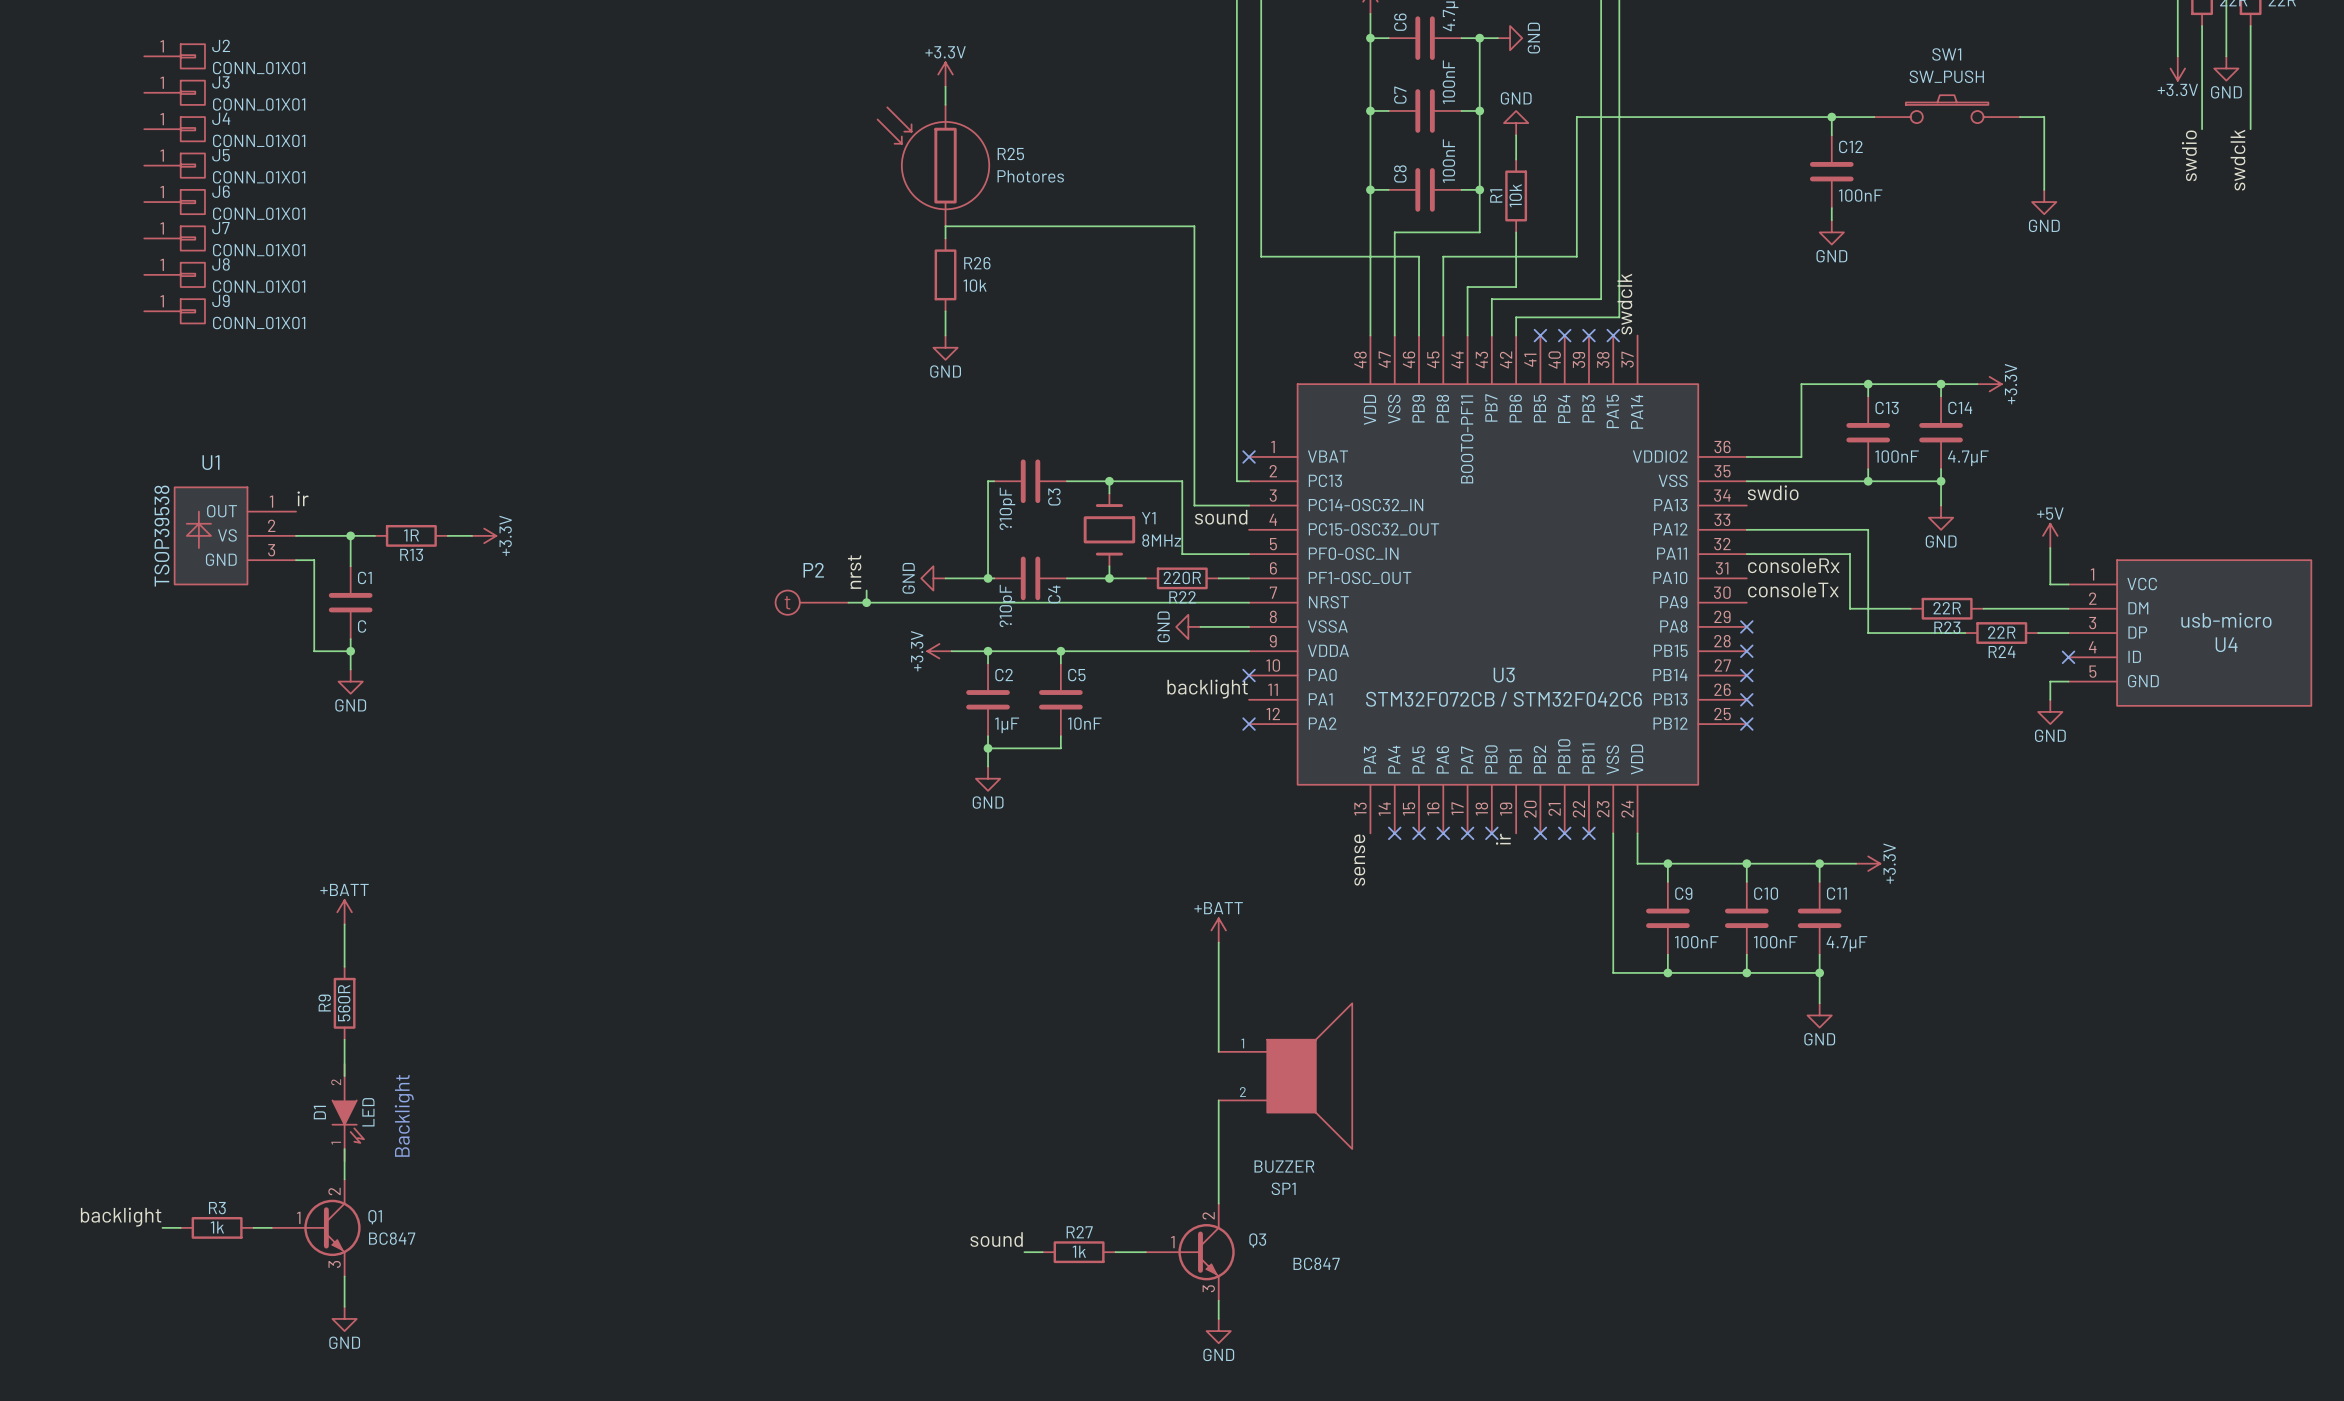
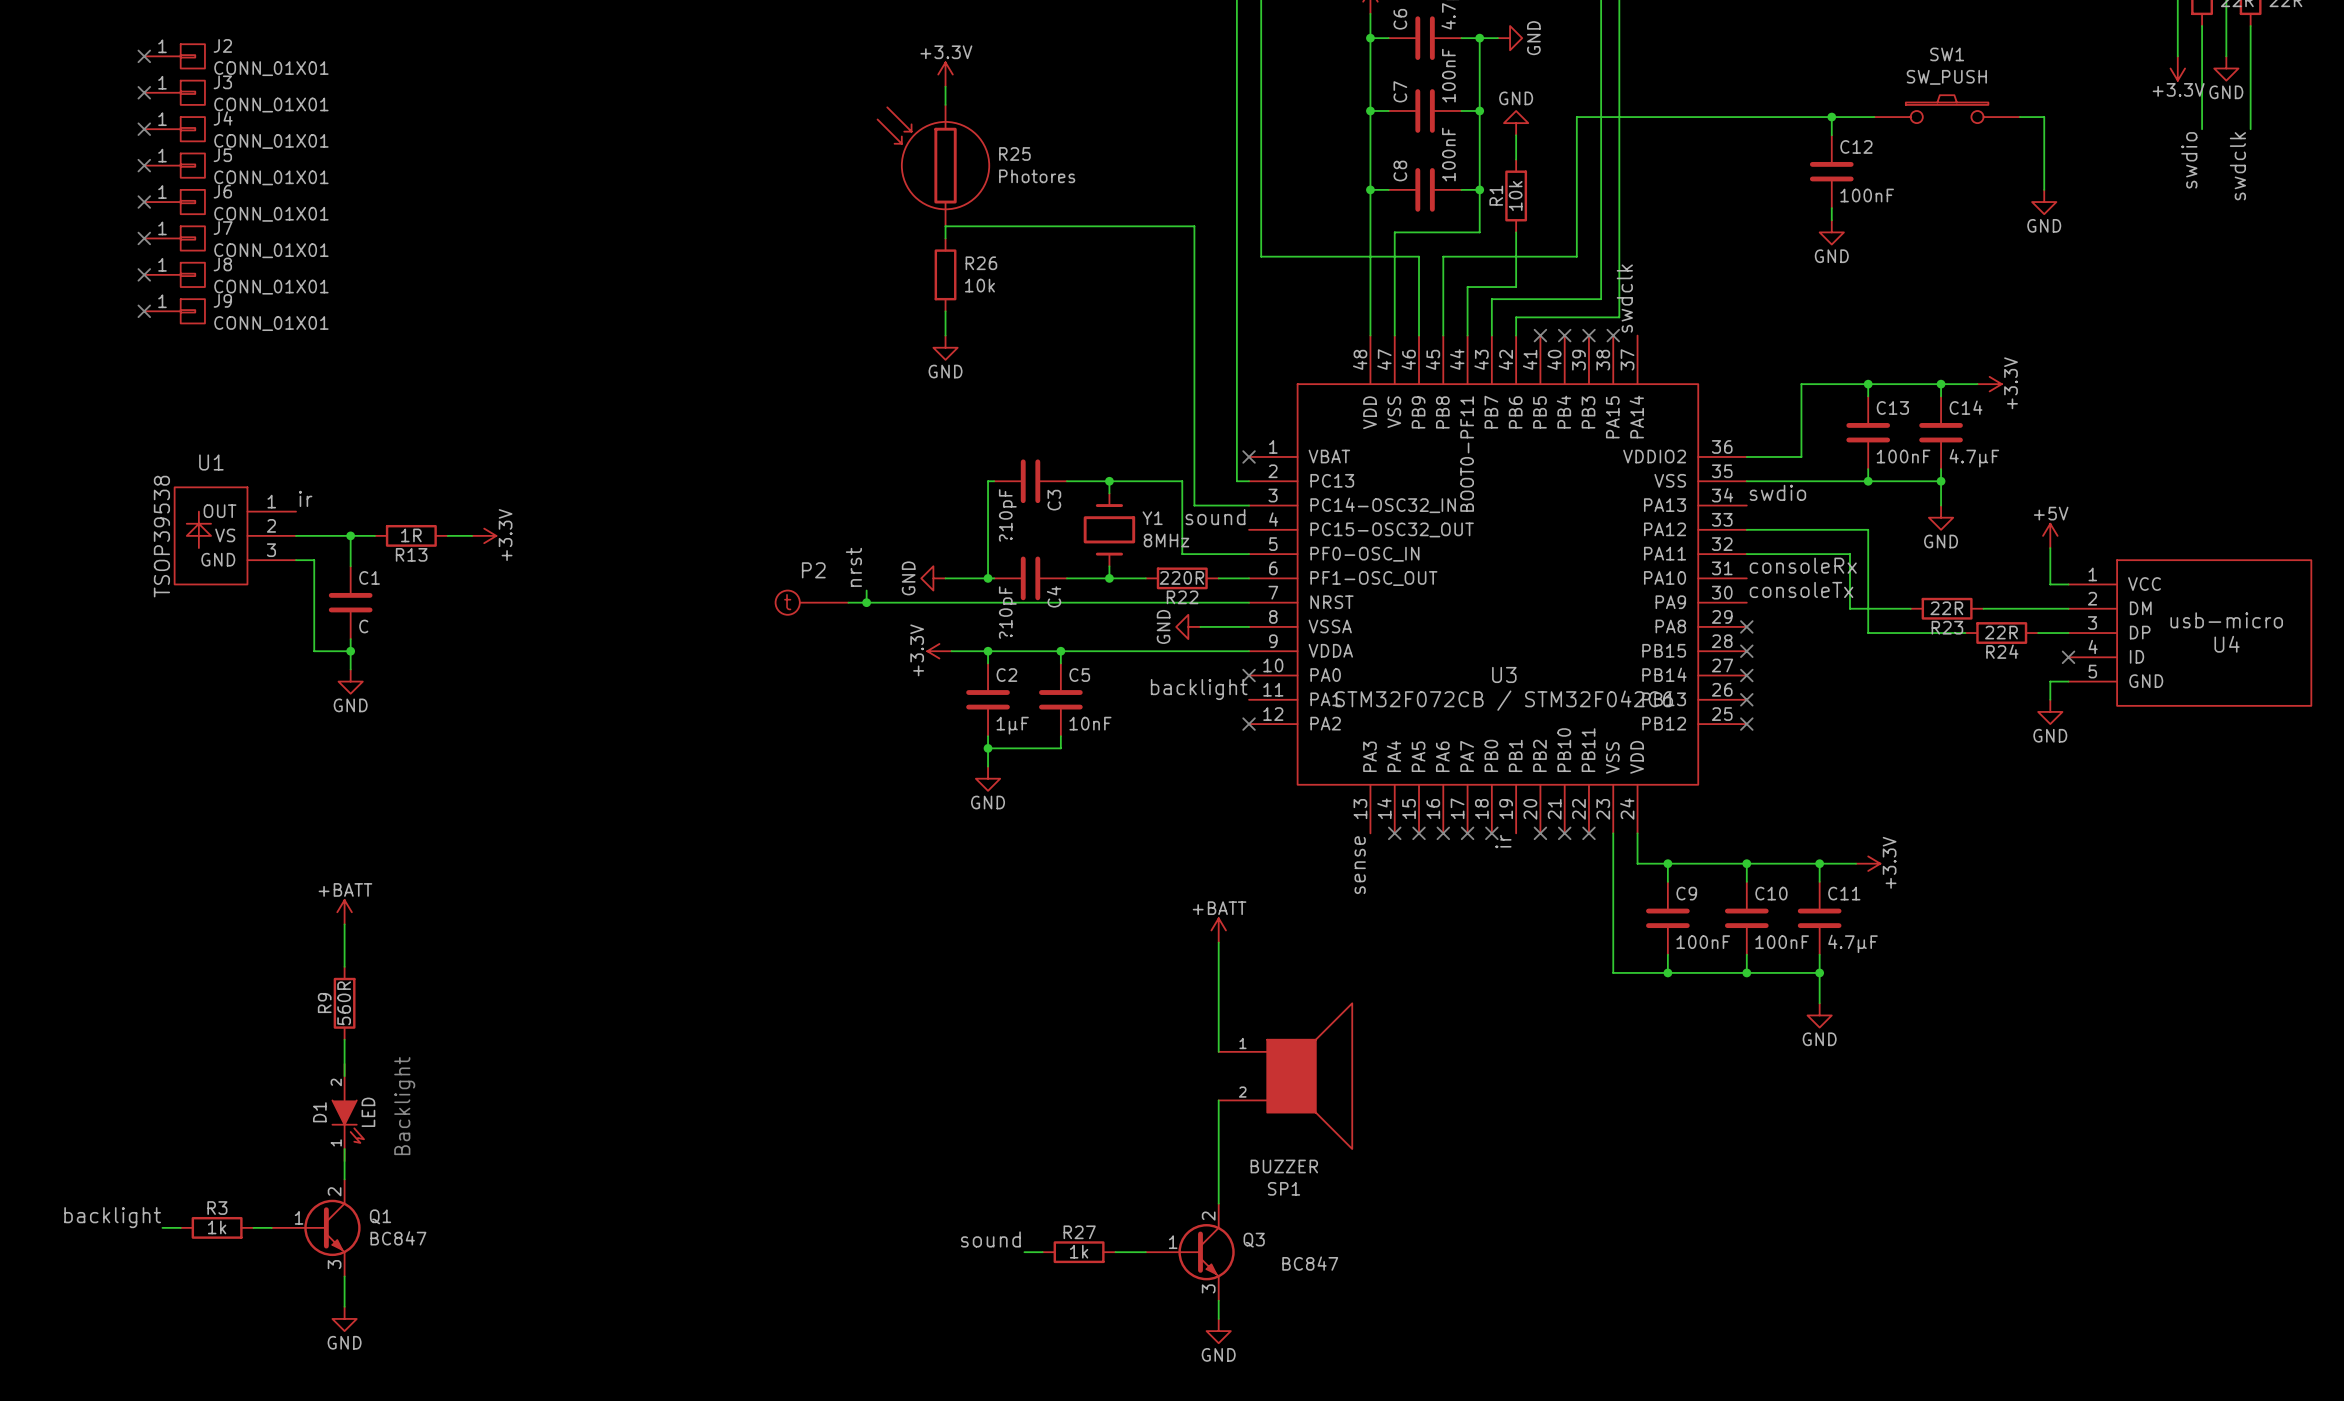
no-connect mark: none -> (144, 56)
no-connect mark: none -> (144, 92)
no-connect mark: none -> (144, 129)
no-connect mark: none -> (144, 165)
no-connect mark: none -> (144, 202)
no-connect mark: none -> (144, 238)
no-connect mark: none -> (144, 274)
no-connect mark: none -> (144, 311)

